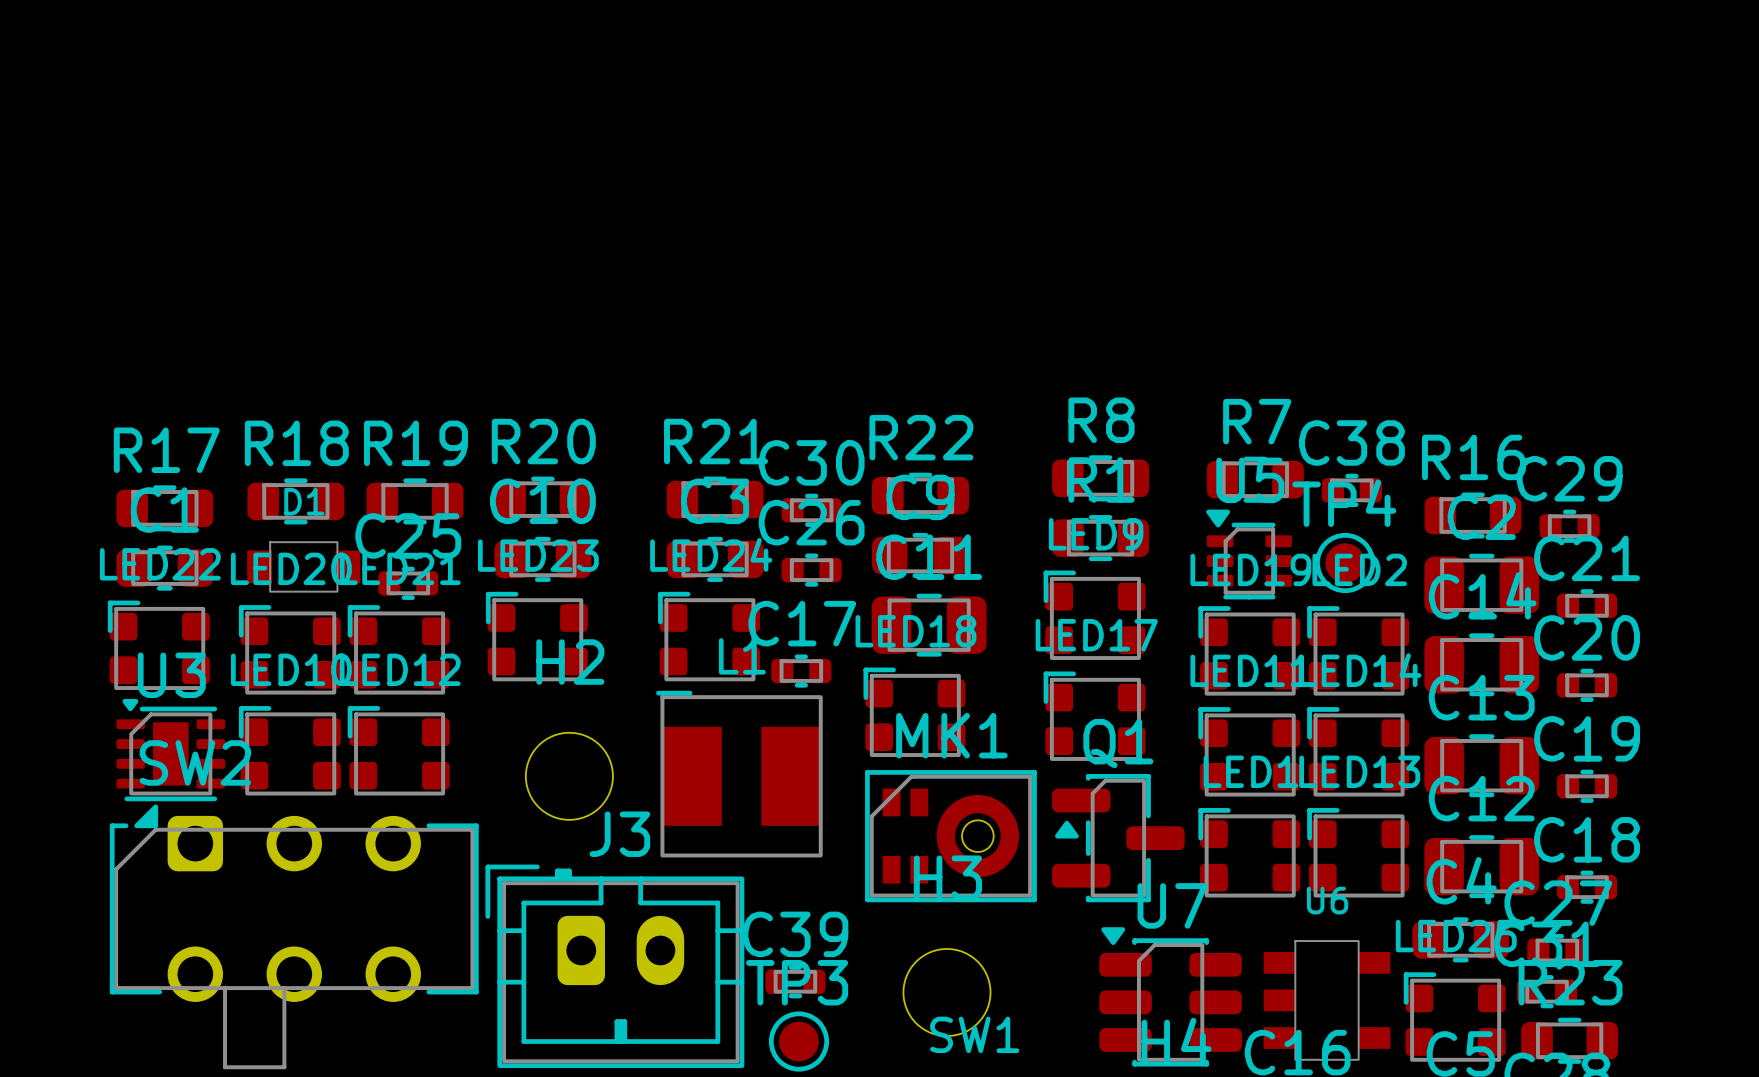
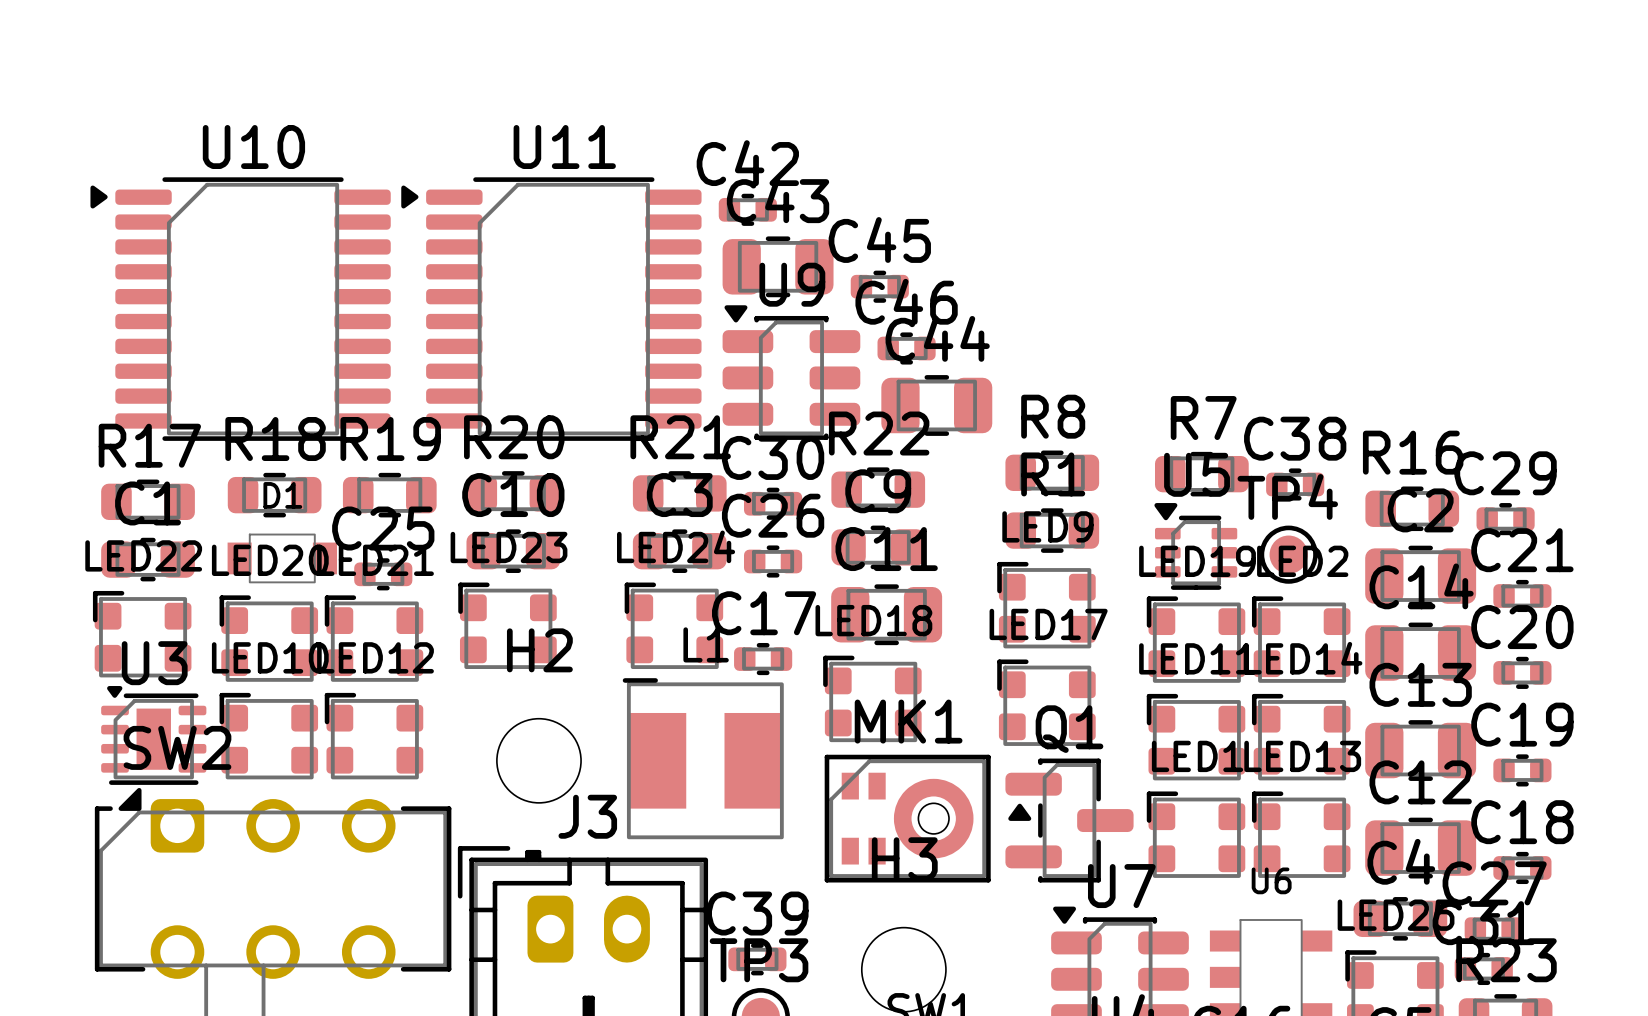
C42: none -> (747, 209)
C43: none -> (778, 266)
C45: none -> (879, 286)
U10: none -> (240, 309)
U11: none -> (551, 309)
C46: none -> (906, 348)
U9: none -> (791, 372)
C44: none -> (936, 405)

